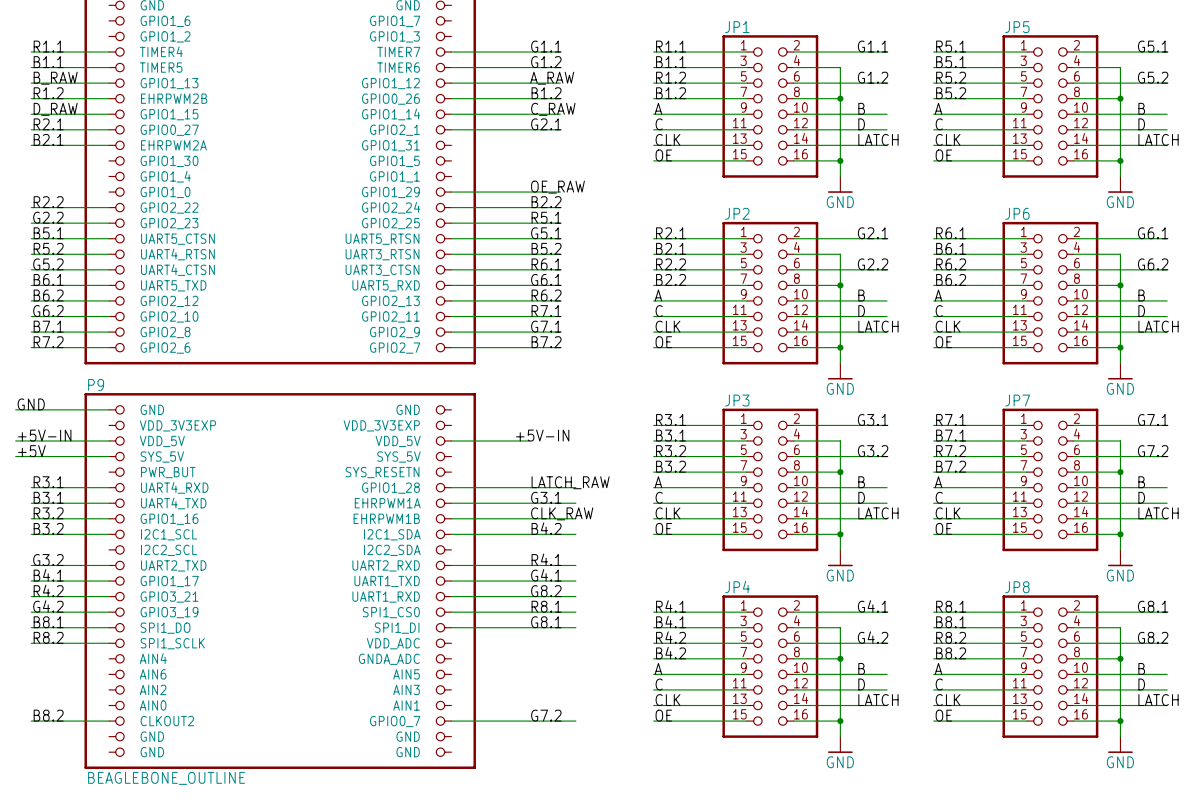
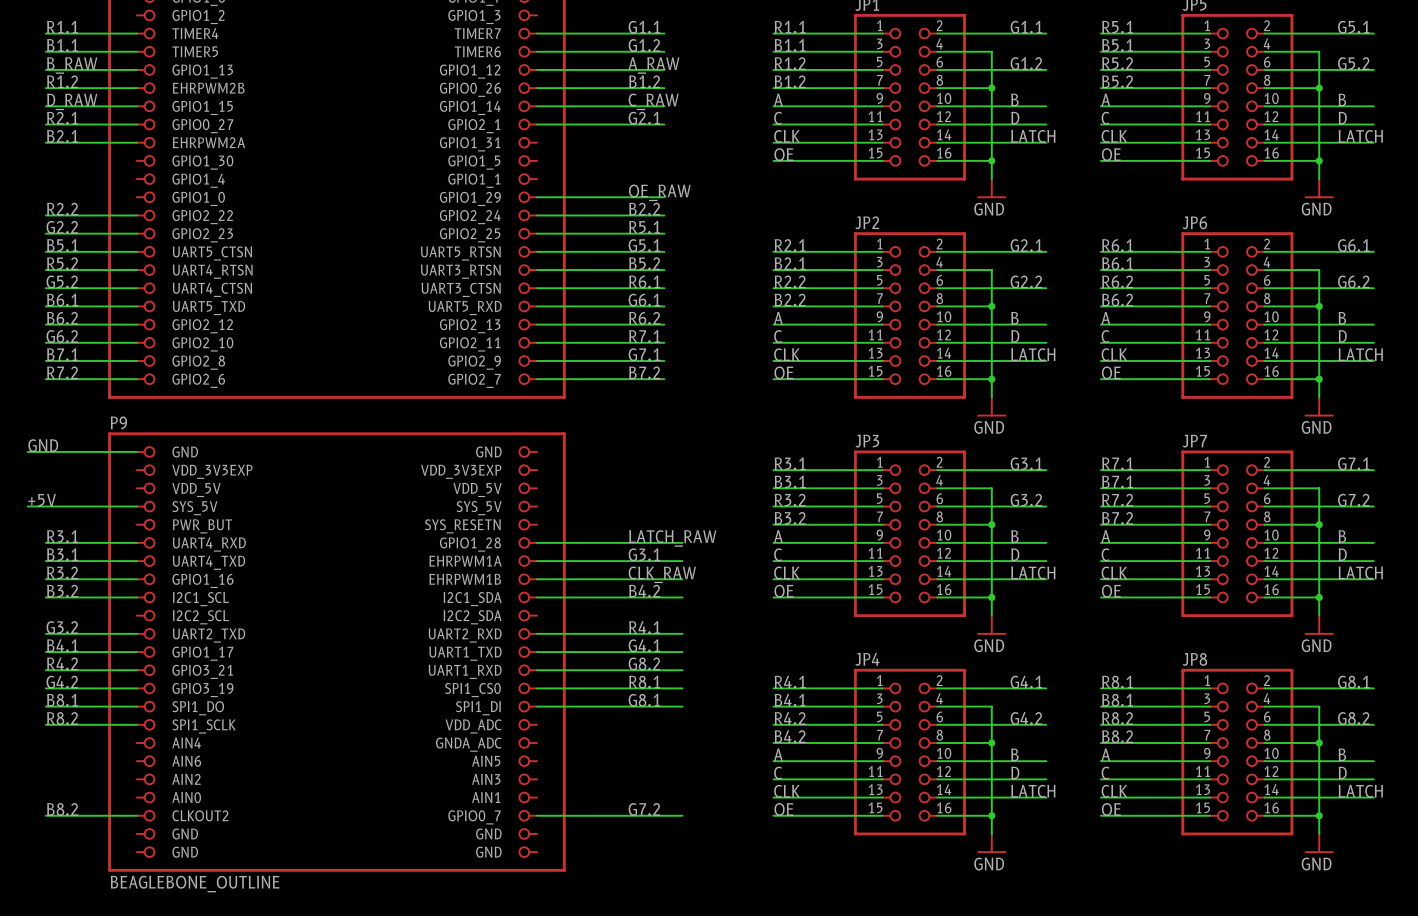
label: +5V-IN (44, 435) -> none
label: +5V-IN (542, 435) -> none
wire: (15, 440) (109, 440) -> none
wire: (451, 440) (529, 440) -> none

